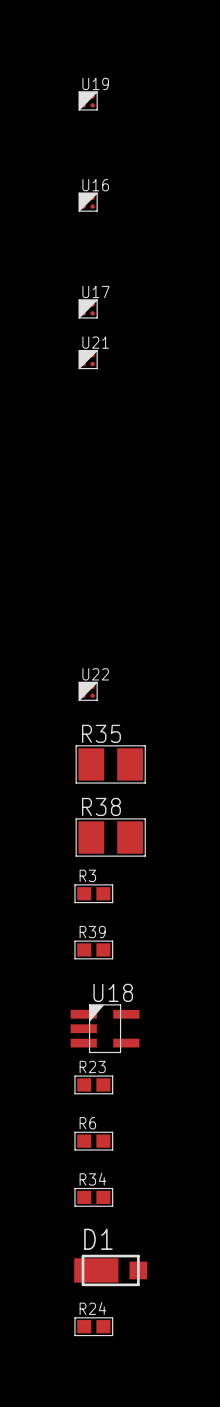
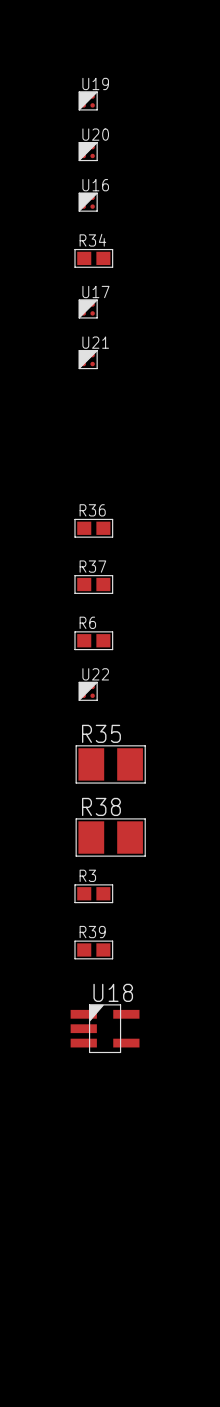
U20: none -> (88, 151)
R36: none -> (93, 528)
R37: none -> (93, 584)
R23: (93, 1084) -> none
R6 position: (93, 1141) -> (93, 640)
R34 position: (93, 1197) -> (93, 258)
D1: (110, 1270) -> none
R24: (93, 1326) -> none

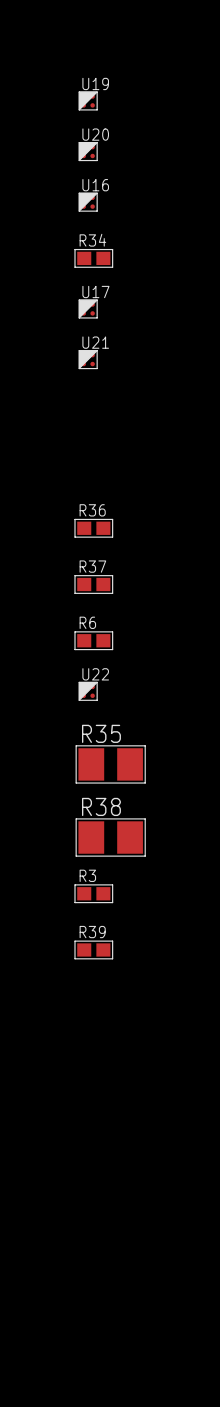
U18: (105, 1028) -> none

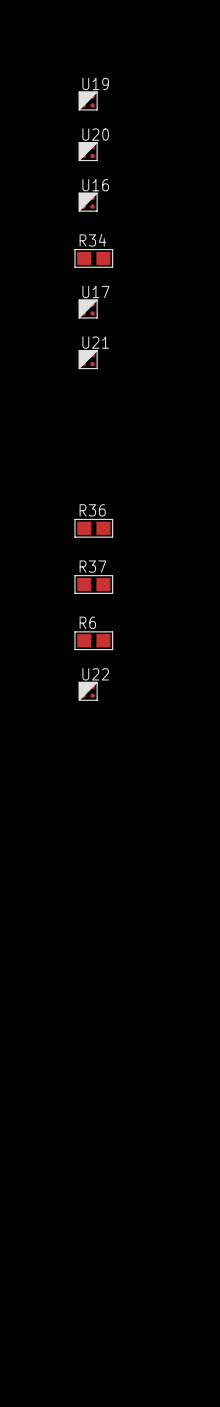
R35: (110, 764) -> none
R38: (110, 837) -> none
R3: (93, 893) -> none
R39: (93, 949) -> none

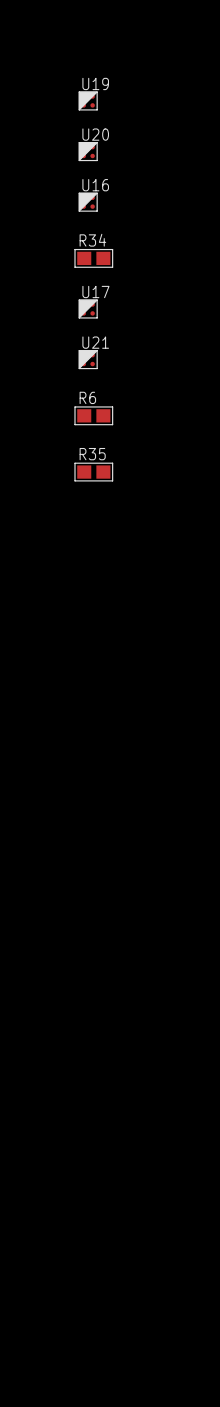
R35: none -> (93, 472)
R36: (93, 528) -> none
R37: (93, 584) -> none
R6 position: (93, 640) -> (93, 415)
U22: (88, 691) -> none

